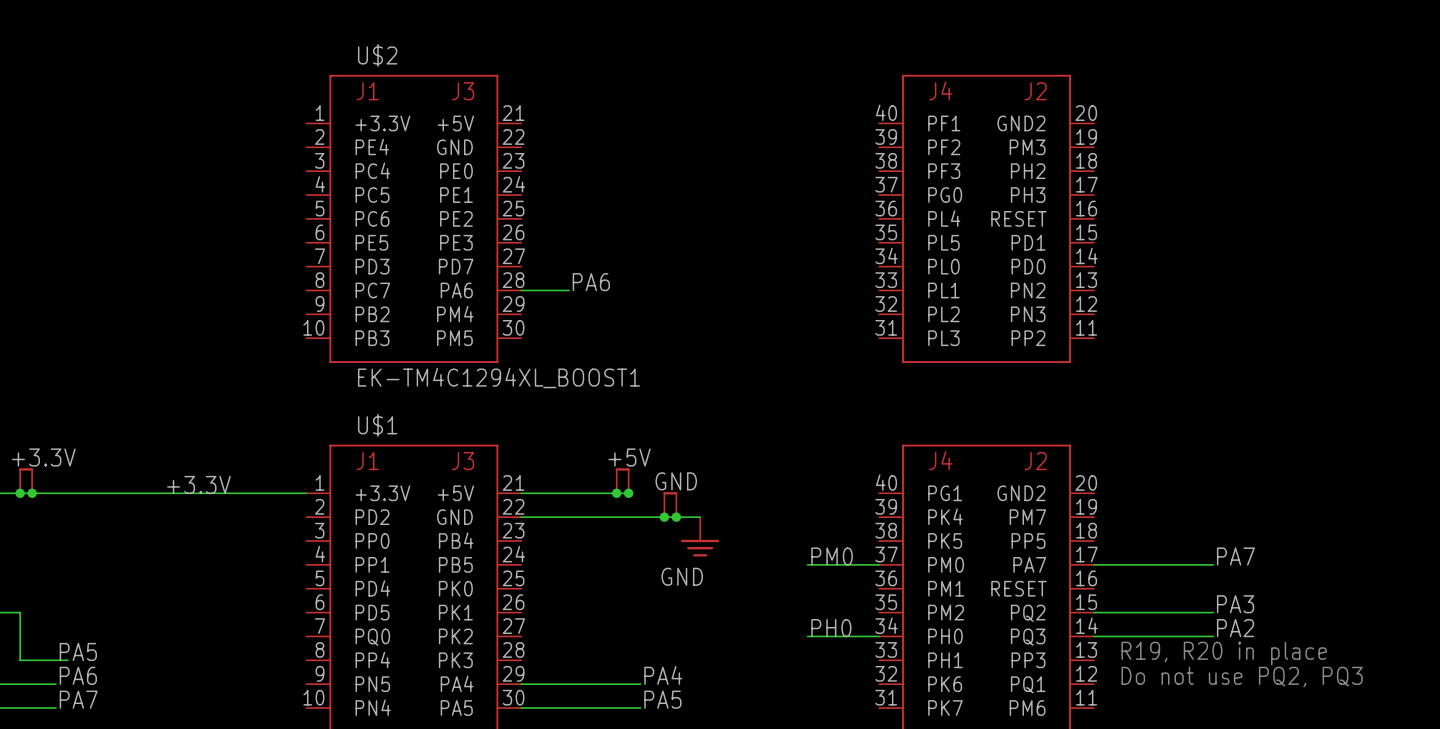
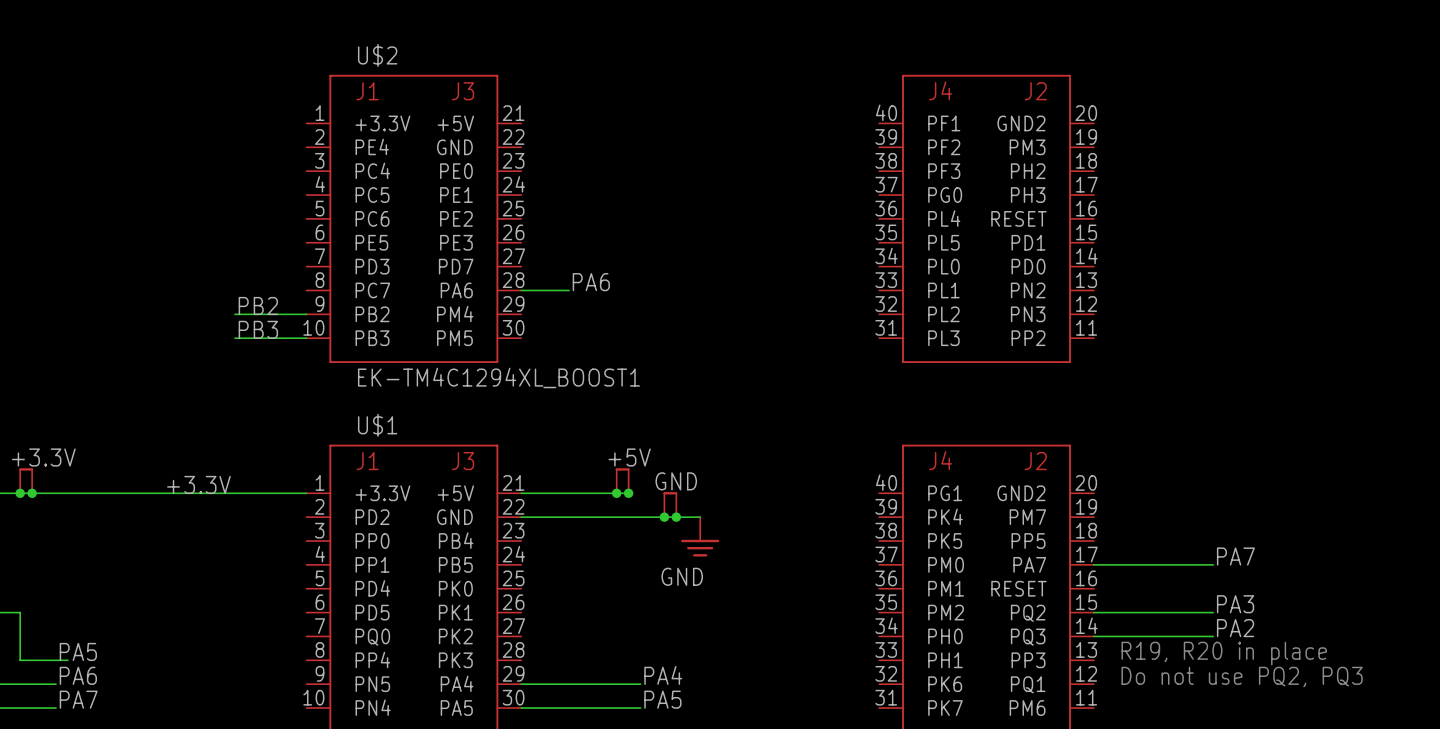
label: none -> PB2 (258, 305)
wire: none -> (234, 314) (306, 314)
label: none -> PB3 (258, 329)
wire: none -> (234, 338) (306, 338)
label: PM0 (832, 556) -> none
wire: (807, 564) (879, 564) -> none
label: PH0 (831, 628) -> none
wire: (807, 636) (879, 636) -> none

